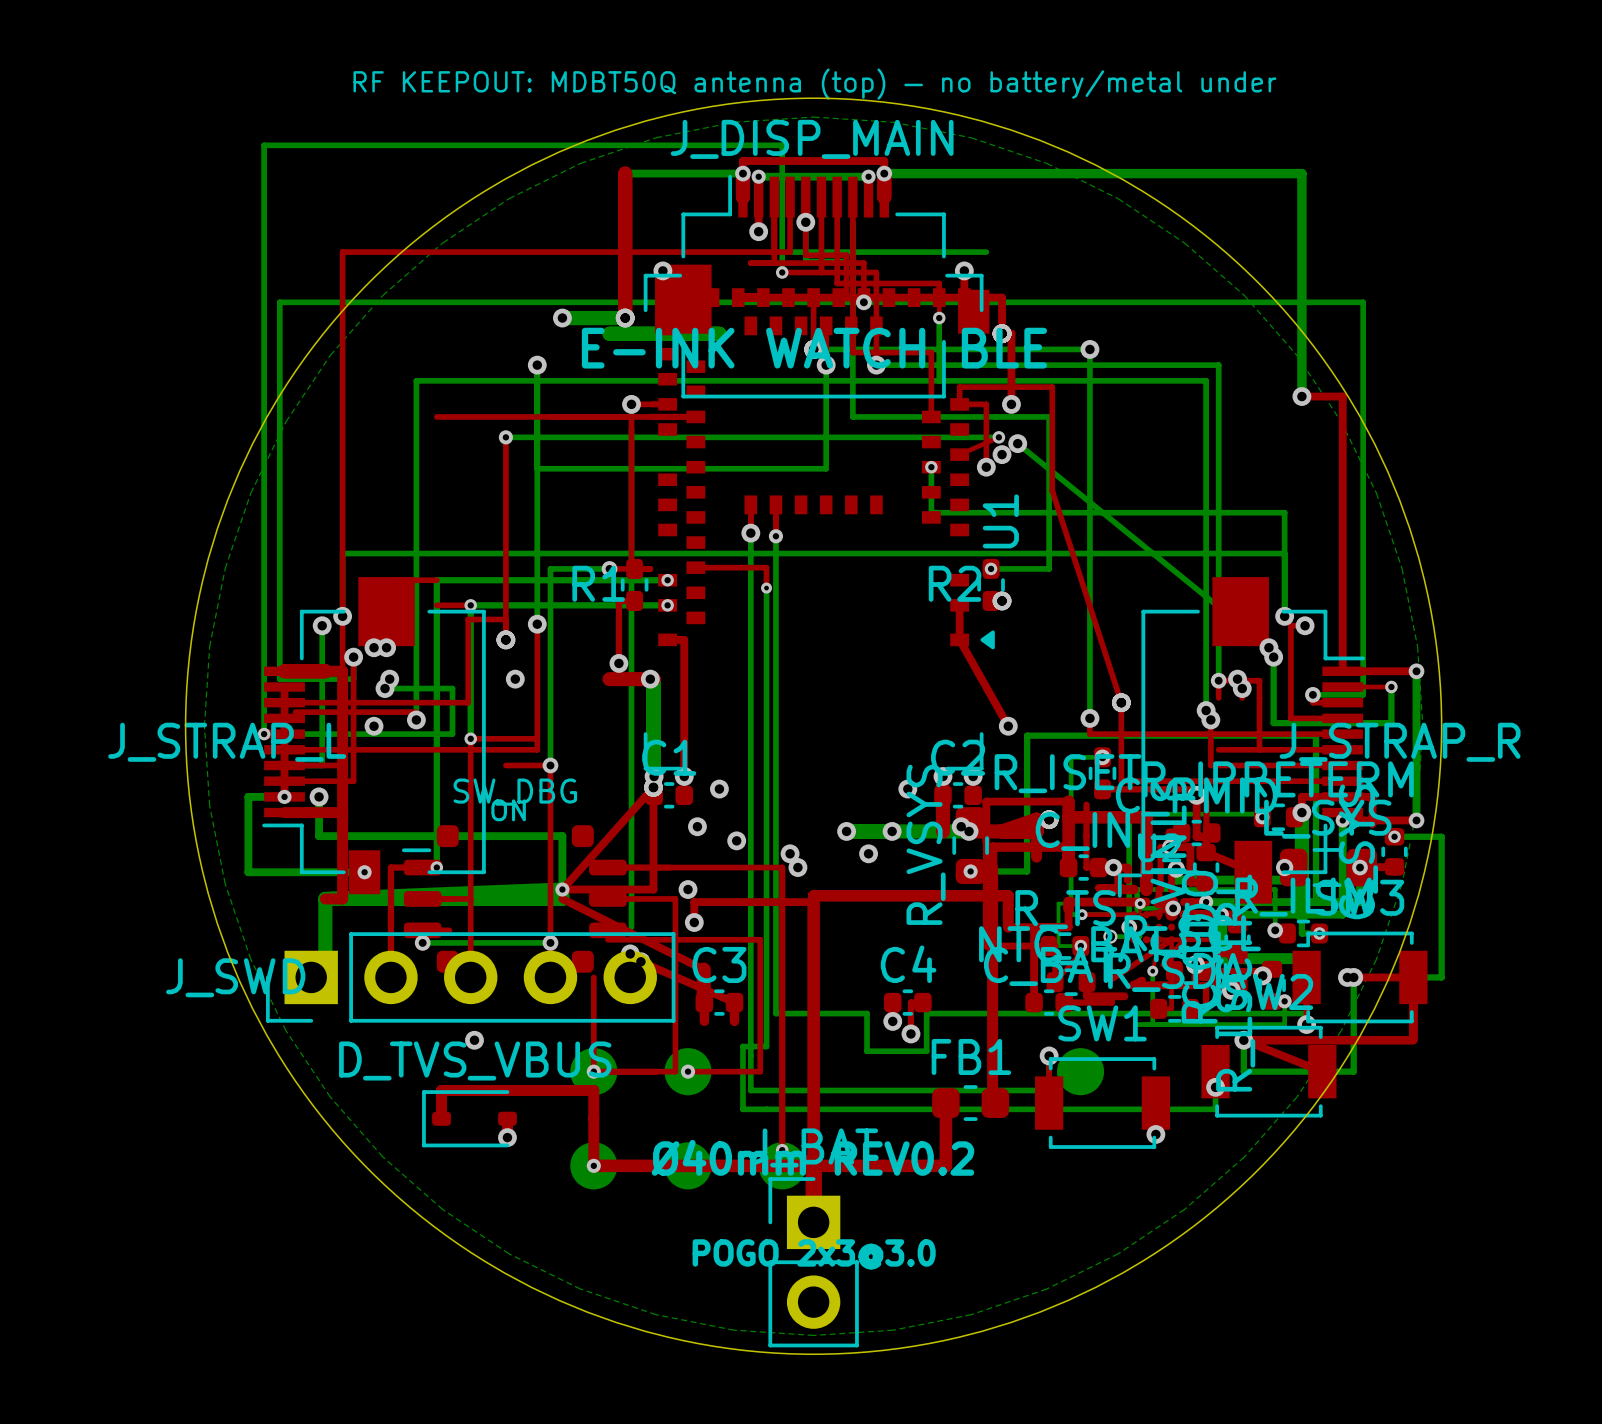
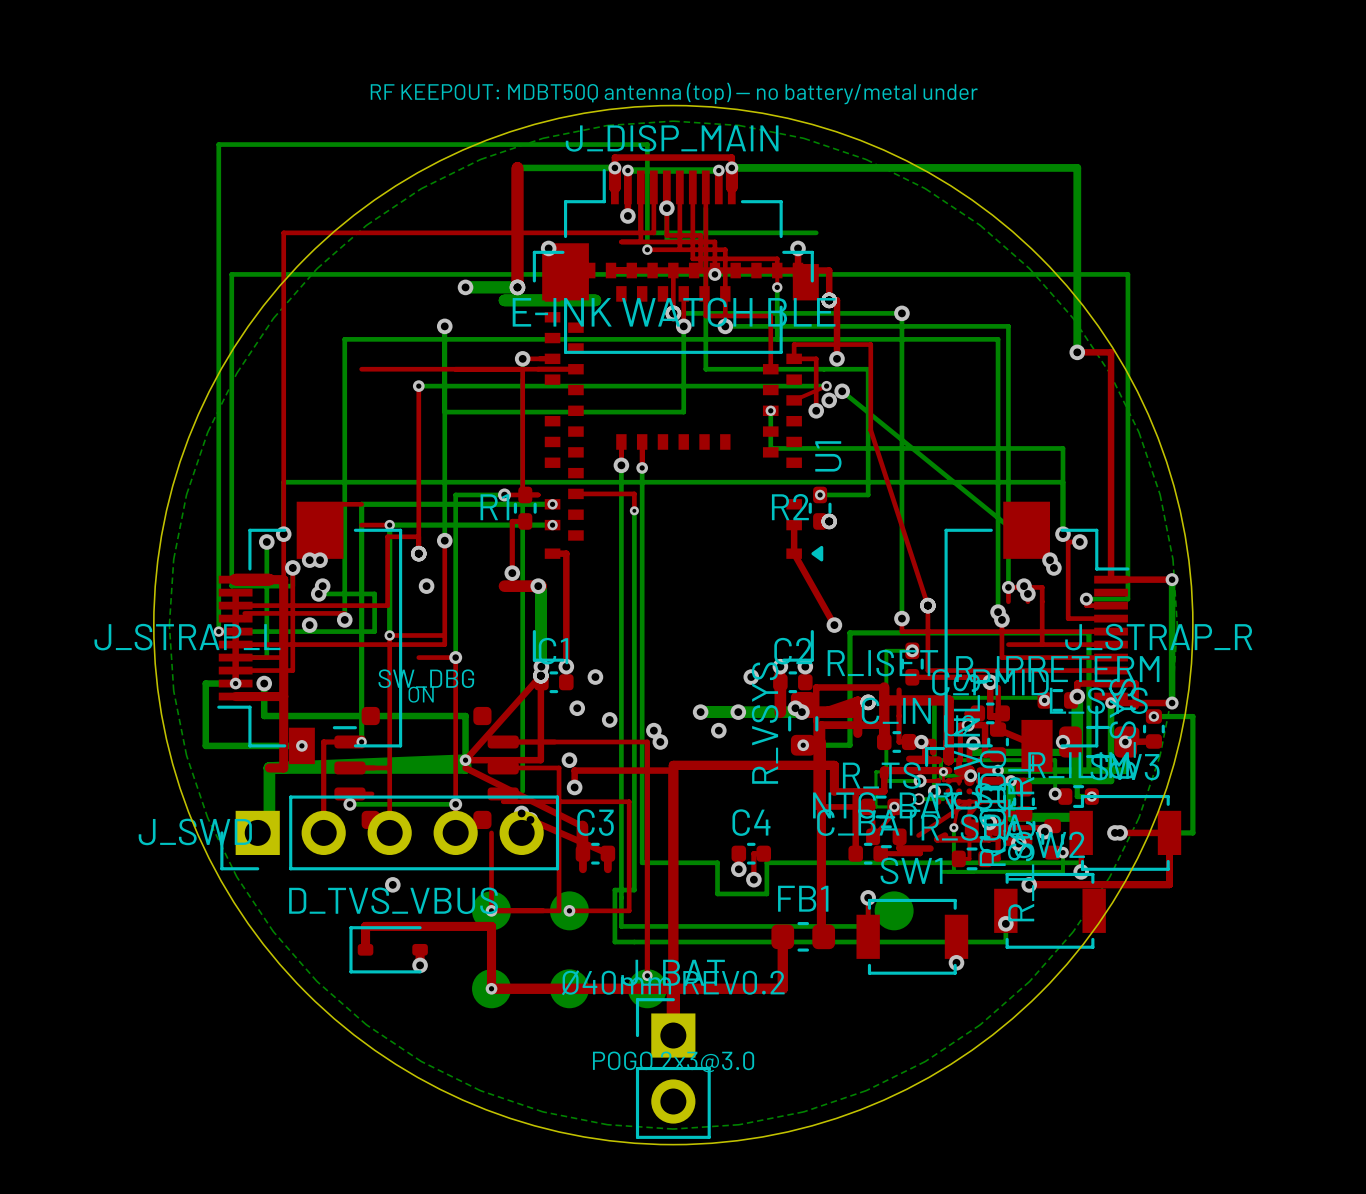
bottom track: (1273, 657) (1273, 723) (1391, 723) (1391, 686) -> none
top track: (1342, 686) (1391, 686) -> none
via: (1391, 686) -> none
top track: (1082, 914) (1111, 914) -> none
via: (1082, 914) -> none
via: none -> (920, 780)
bottom track: (1353, 977) (1353, 1071) (1243, 1071) (1243, 1040) -> none
top track: (1243, 1040) (1322, 1071) -> none

